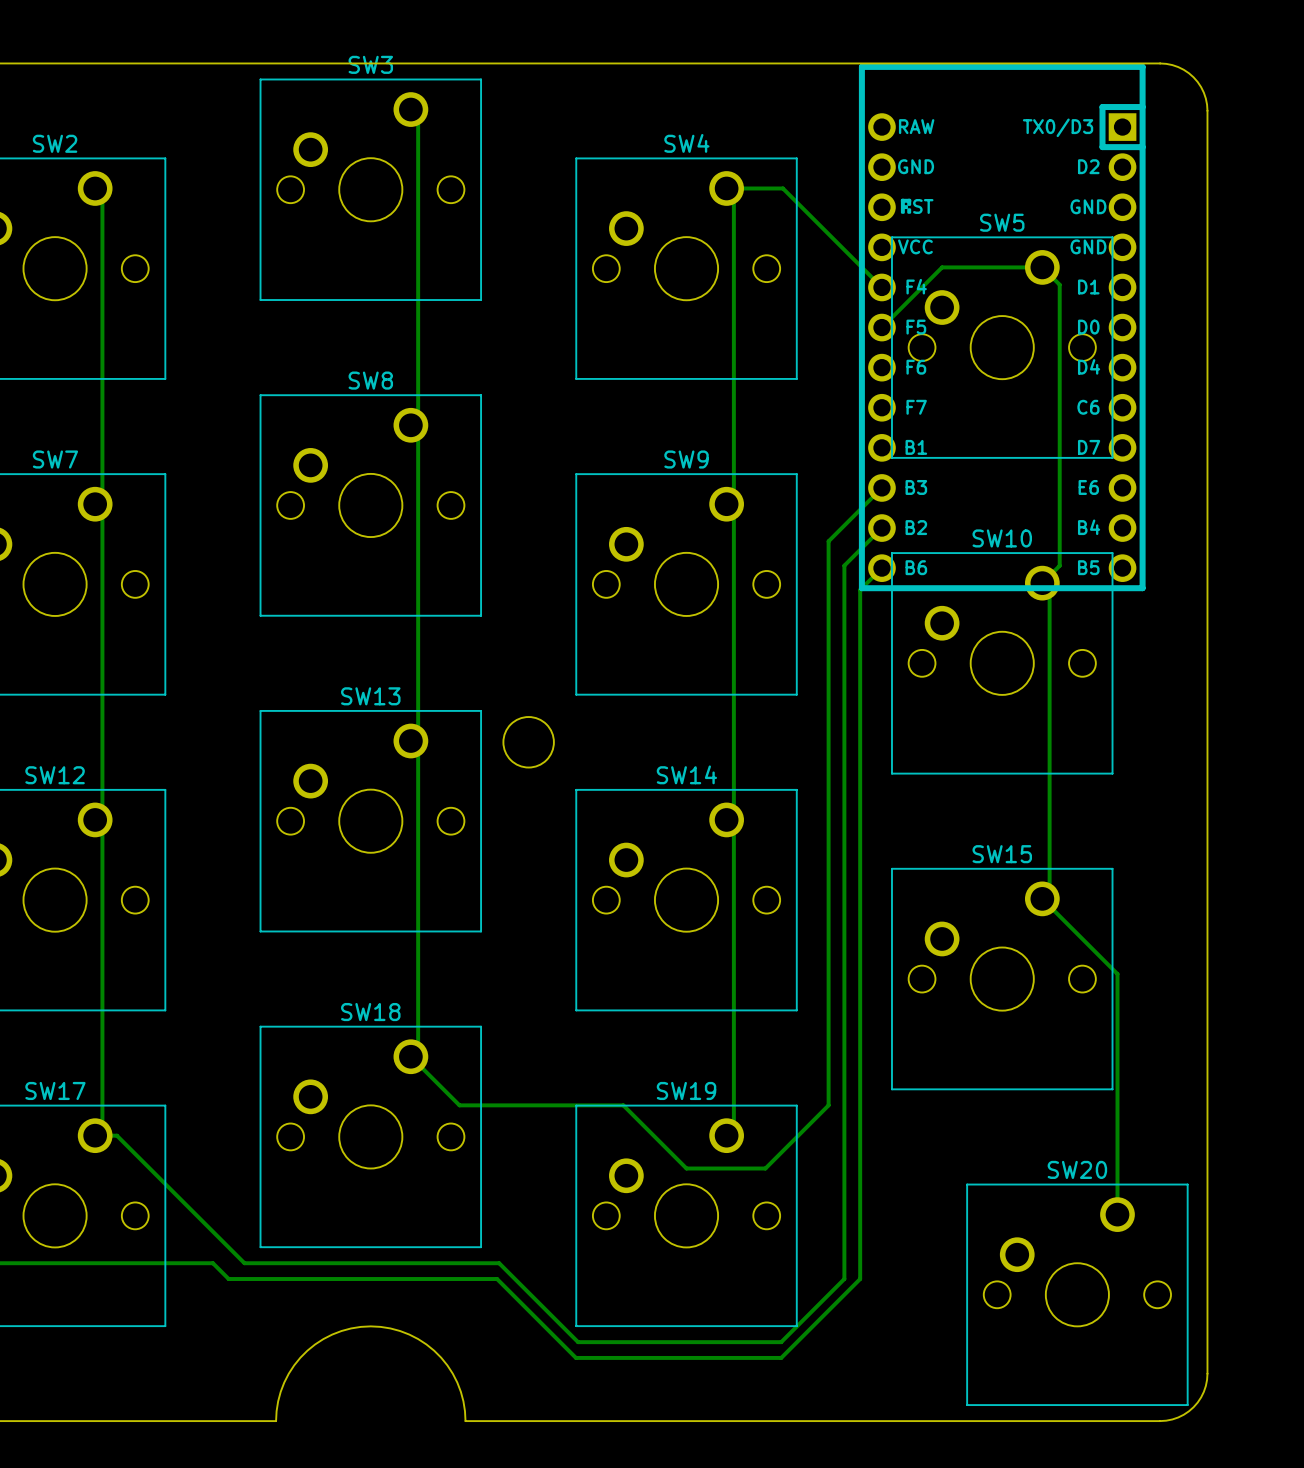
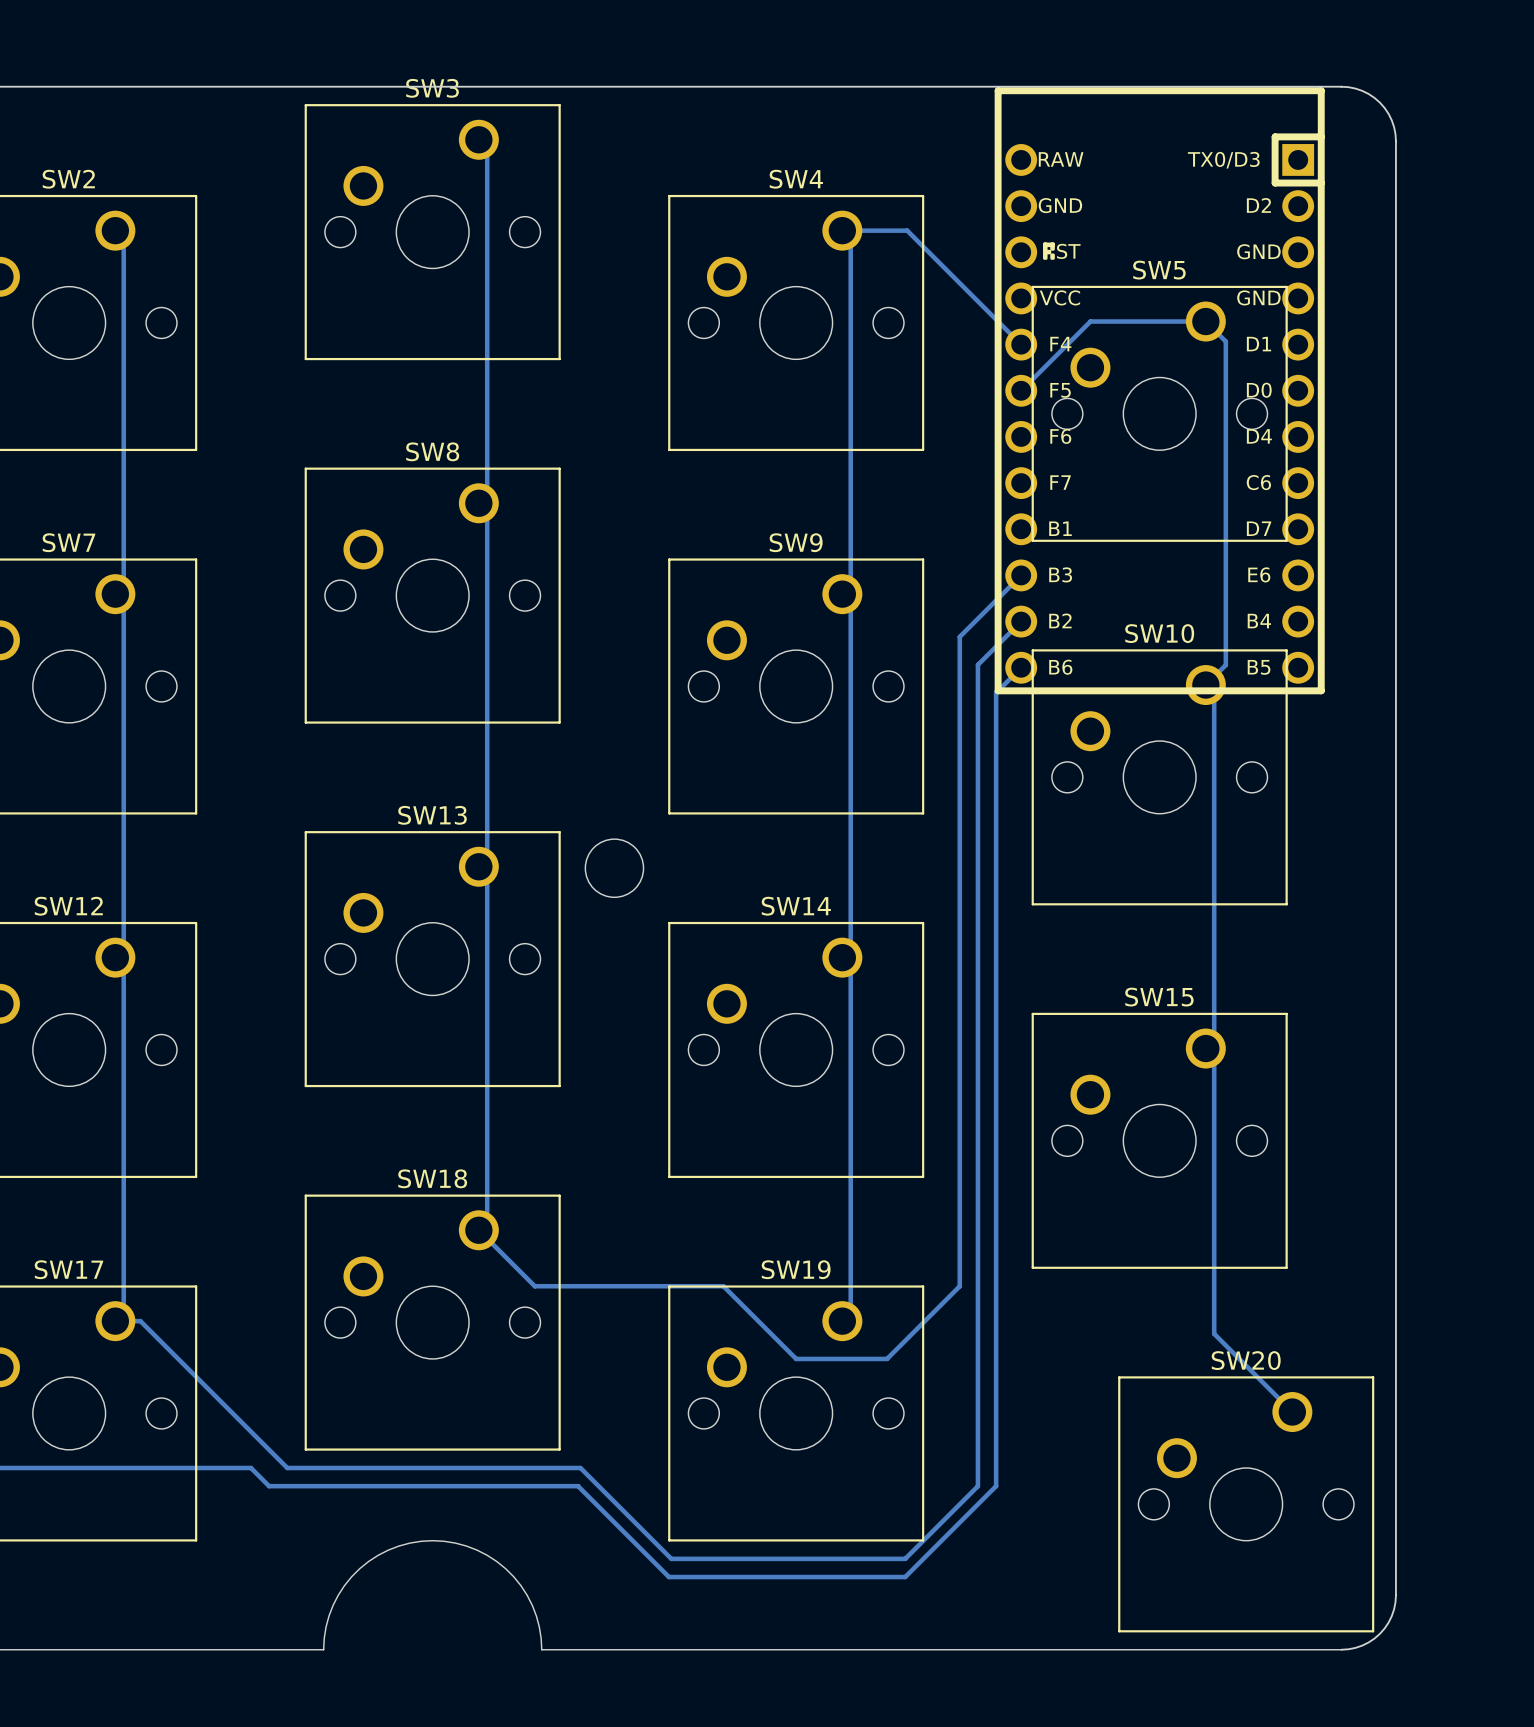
track: (1049, 906) (1117, 974) (1117, 1214) -> (1214, 1056) (1214, 1333) (1292, 1412)

